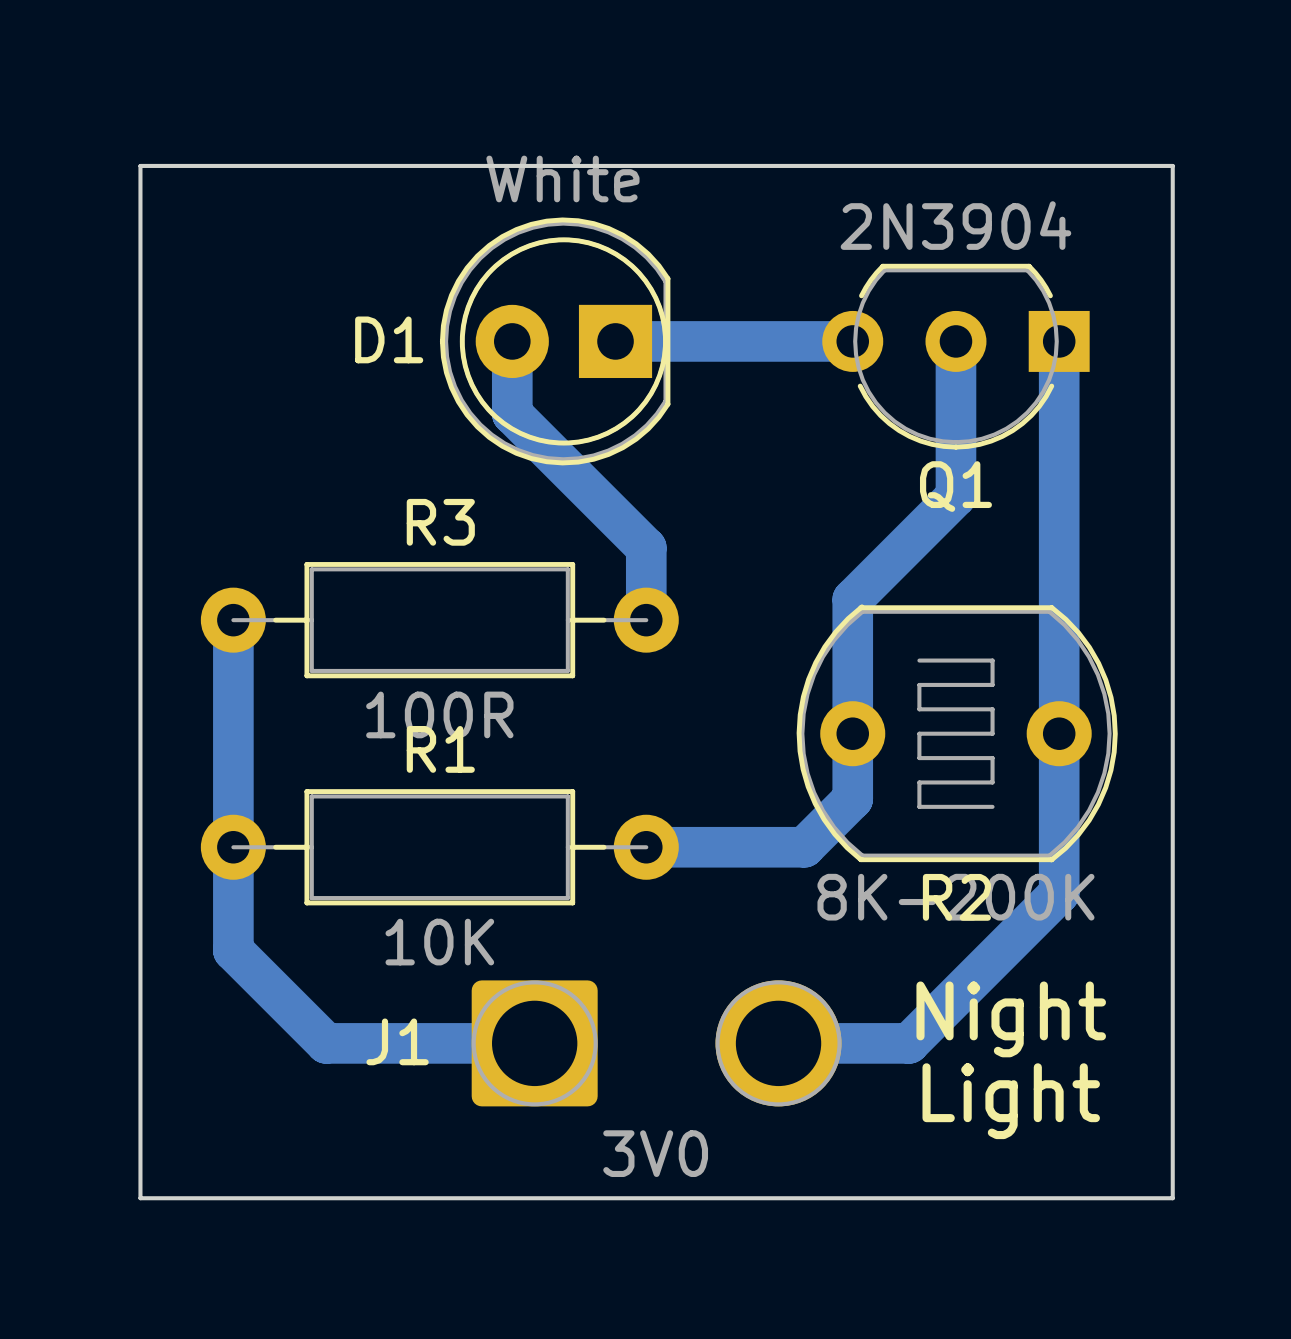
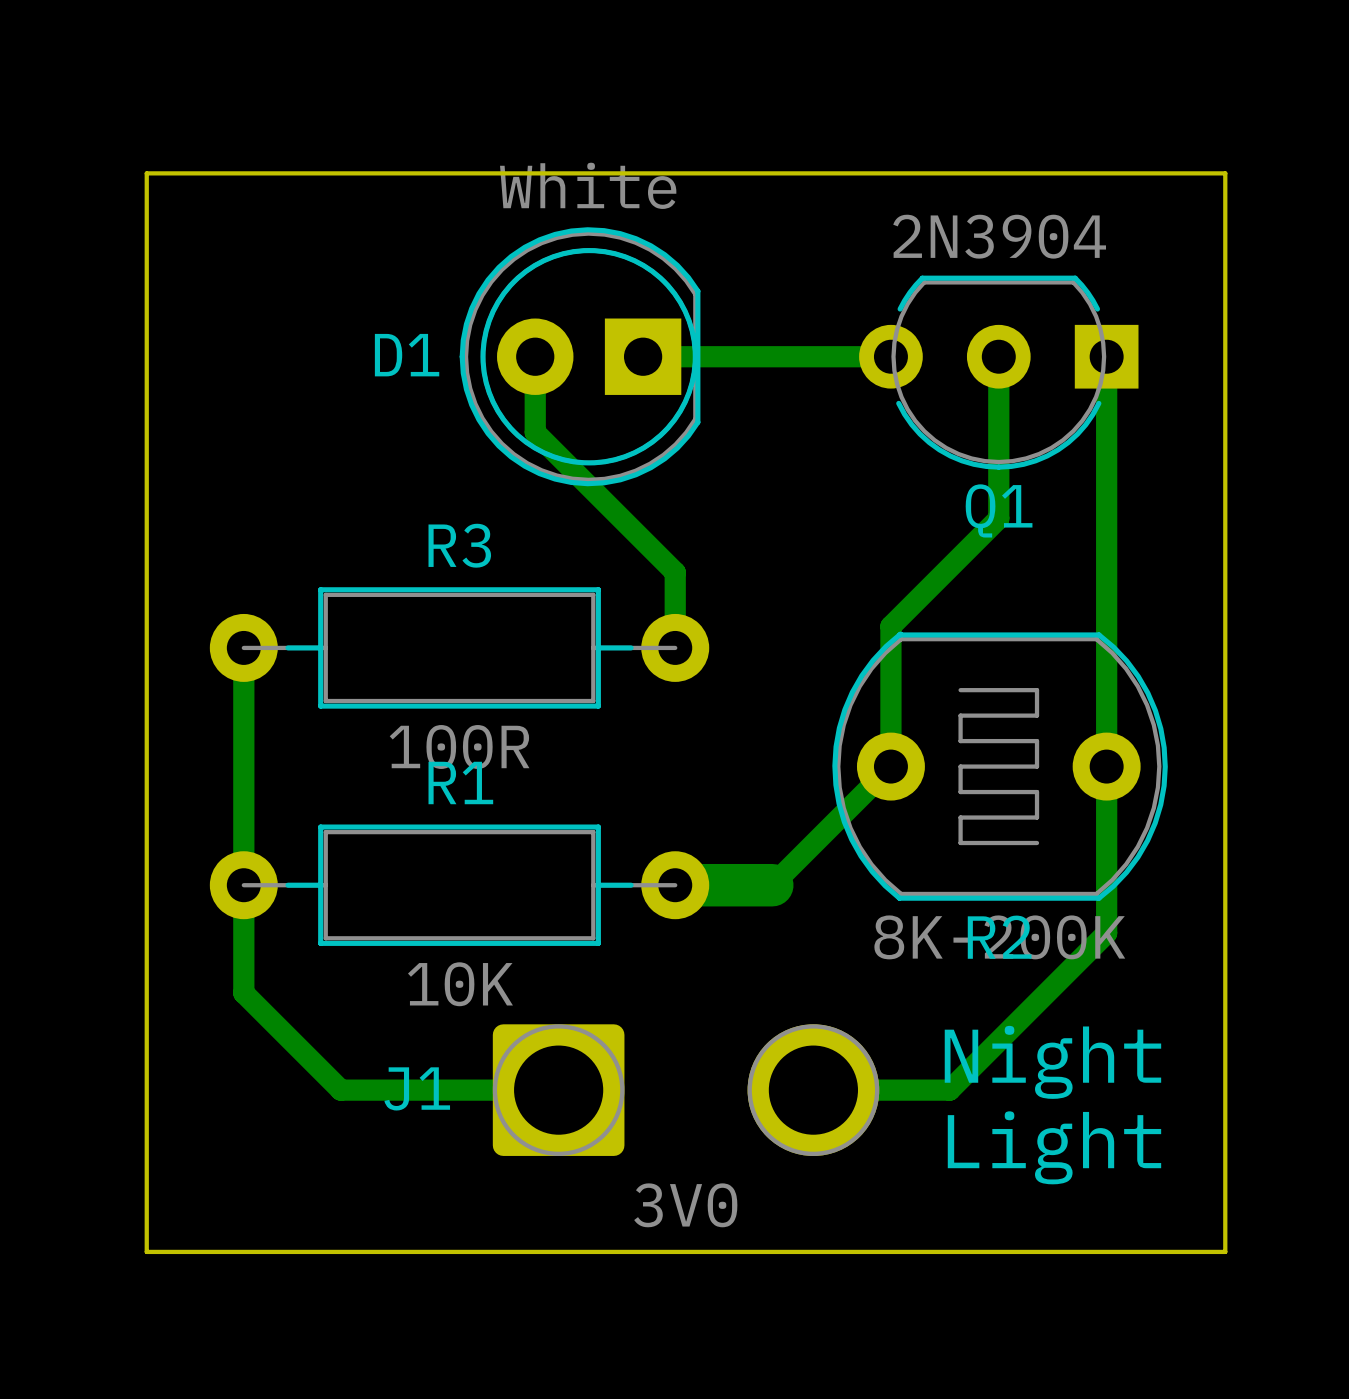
bottom track width: thick (512, 341) (512, 413) (646, 547) (646, 620) -> thin (535, 356) (535, 432) (675, 572) (675, 647)
bottom track width: thick (615, 341) (852, 341) -> thin (643, 356) (890, 356)
bottom track width: thick (955, 341) (955, 496) (852, 599) (852, 733) -> thin (998, 356) (998, 518) (890, 626) (890, 766)
bottom track width: thick (1059, 341) (1059, 893) (908, 1043) (778, 1043) -> thin (1106, 356) (1106, 933) (949, 1090) (813, 1090)
bottom track width: thick (233, 620) (233, 950) (326, 1043) (534, 1043) -> thin (243, 647) (243, 993) (340, 1090) (558, 1090)
bottom track: (852, 733) (852, 798) (804, 847) (739, 847) -> (890, 766) (772, 885)

